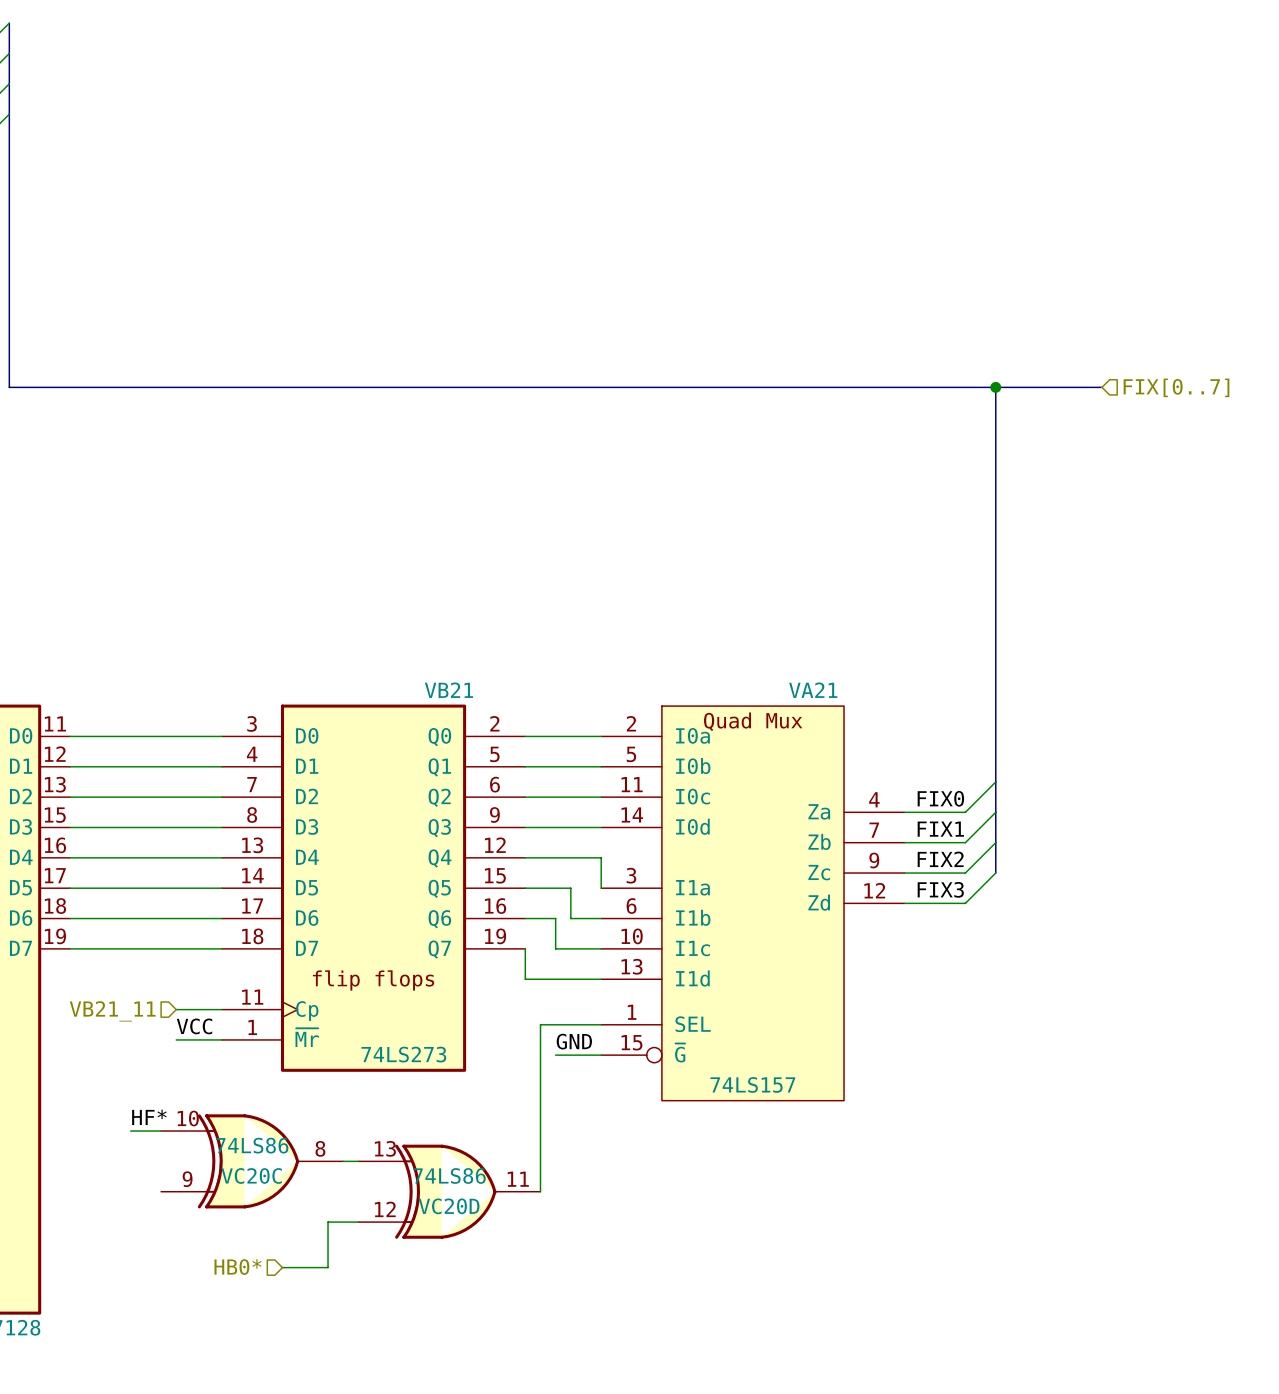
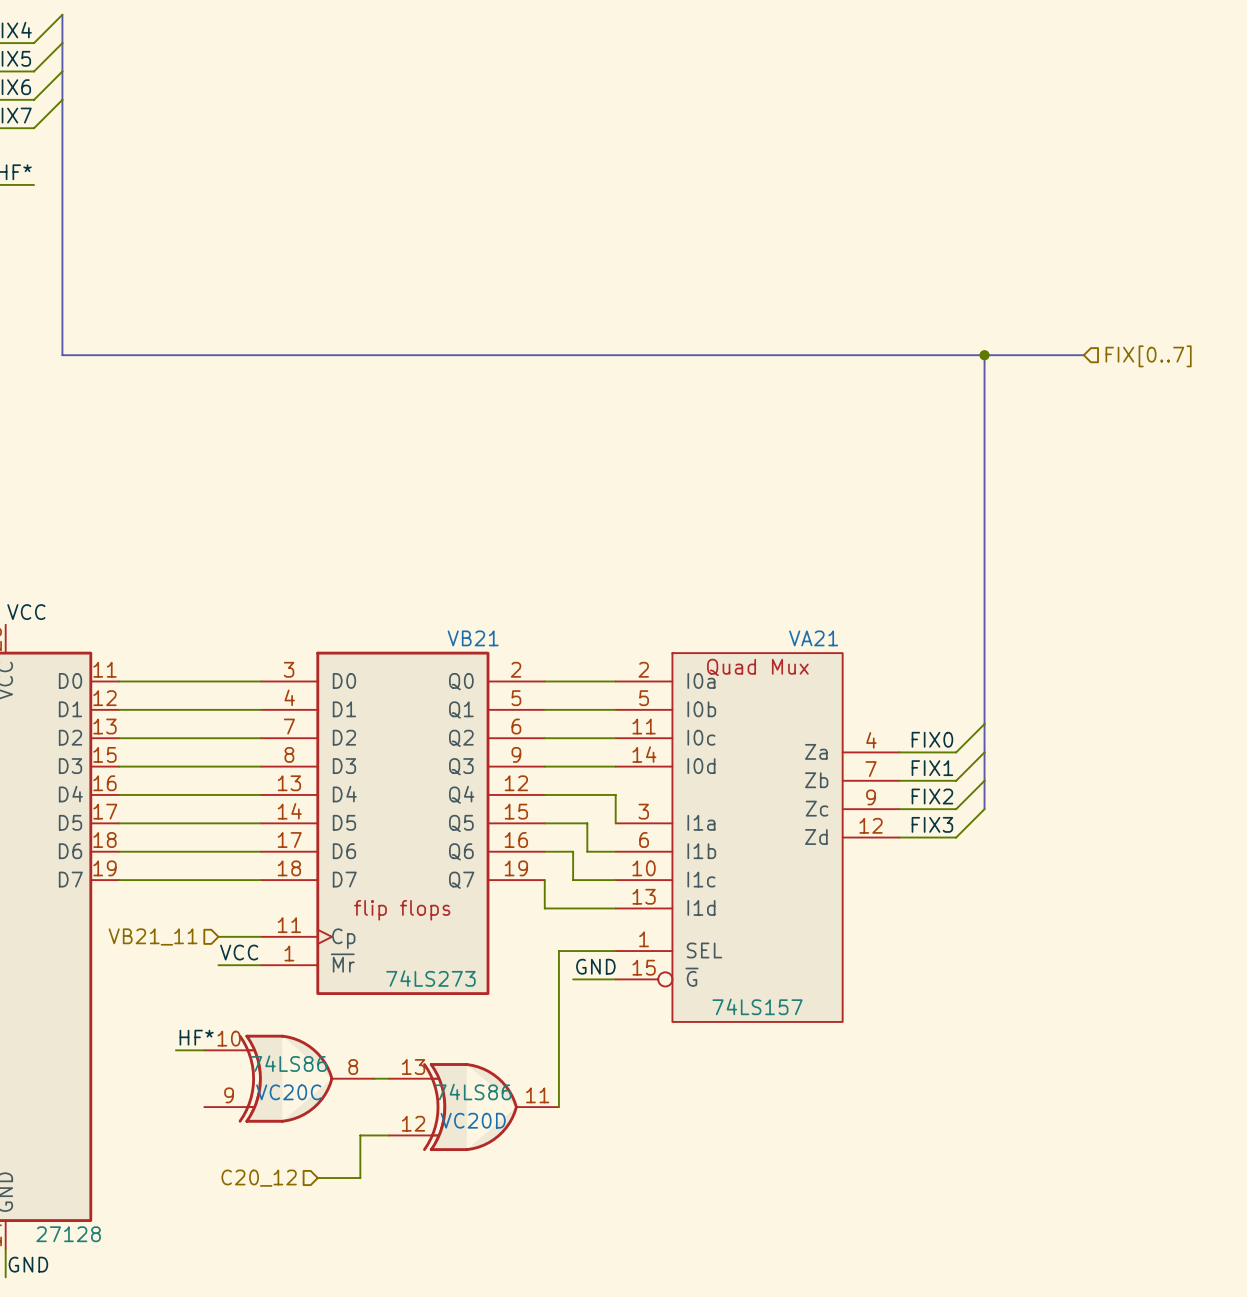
hierarchical label: HB0* (238, 1267) -> C20_12 (259, 1178)

